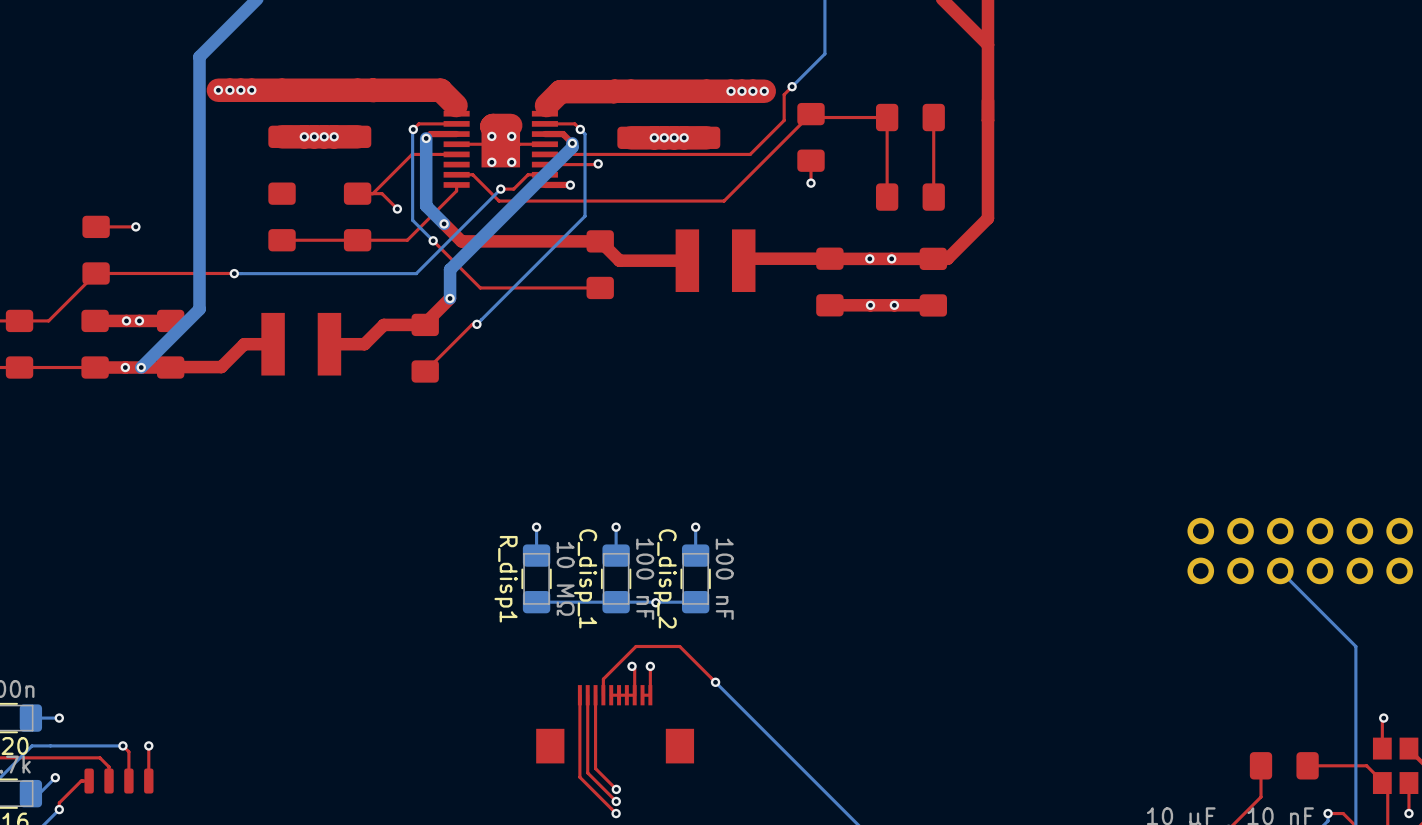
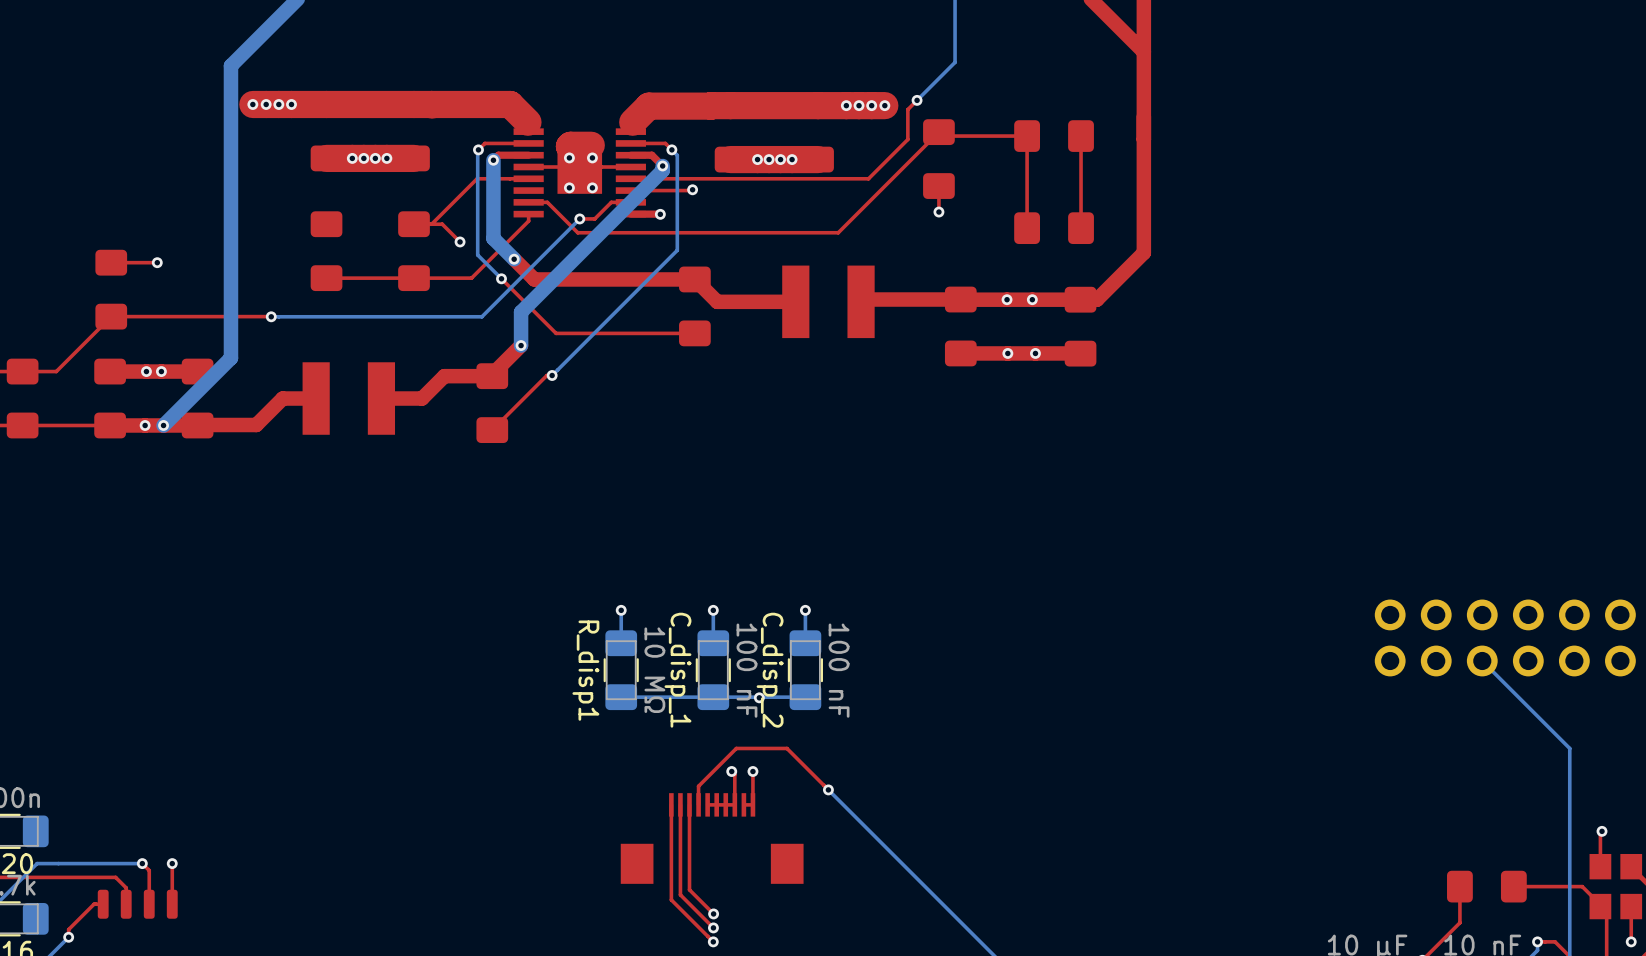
bottom track: (59, 718) (30, 718) -> none
via: (59, 718) -> none
bottom track: (55, 777) (39, 793) (30, 793) -> none
via: (55, 777) -> none

